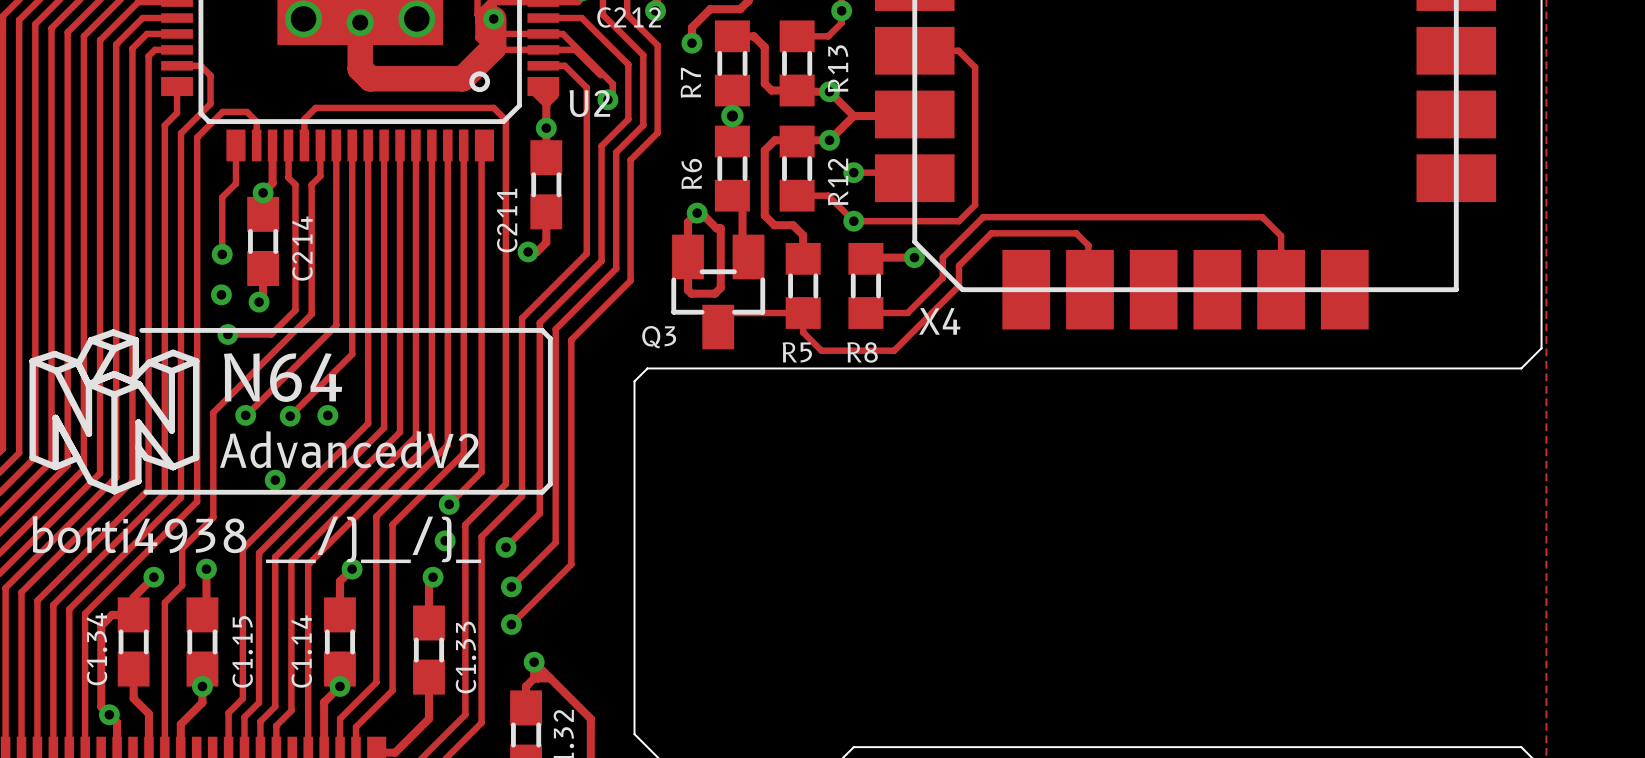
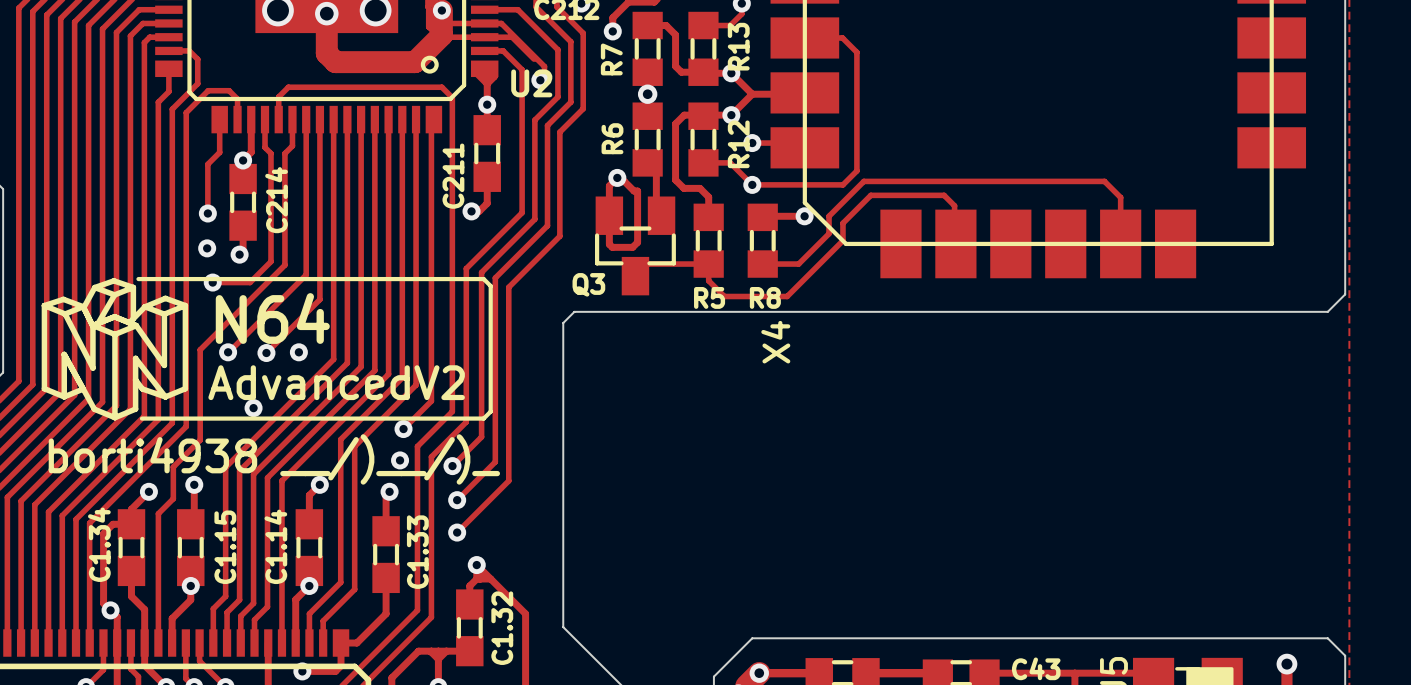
X4 name rotation: 0° (939, 321) -> 90° counterclockwise (775, 342)
X4 name position: X4 (939, 321) -> X4 (775, 342)

